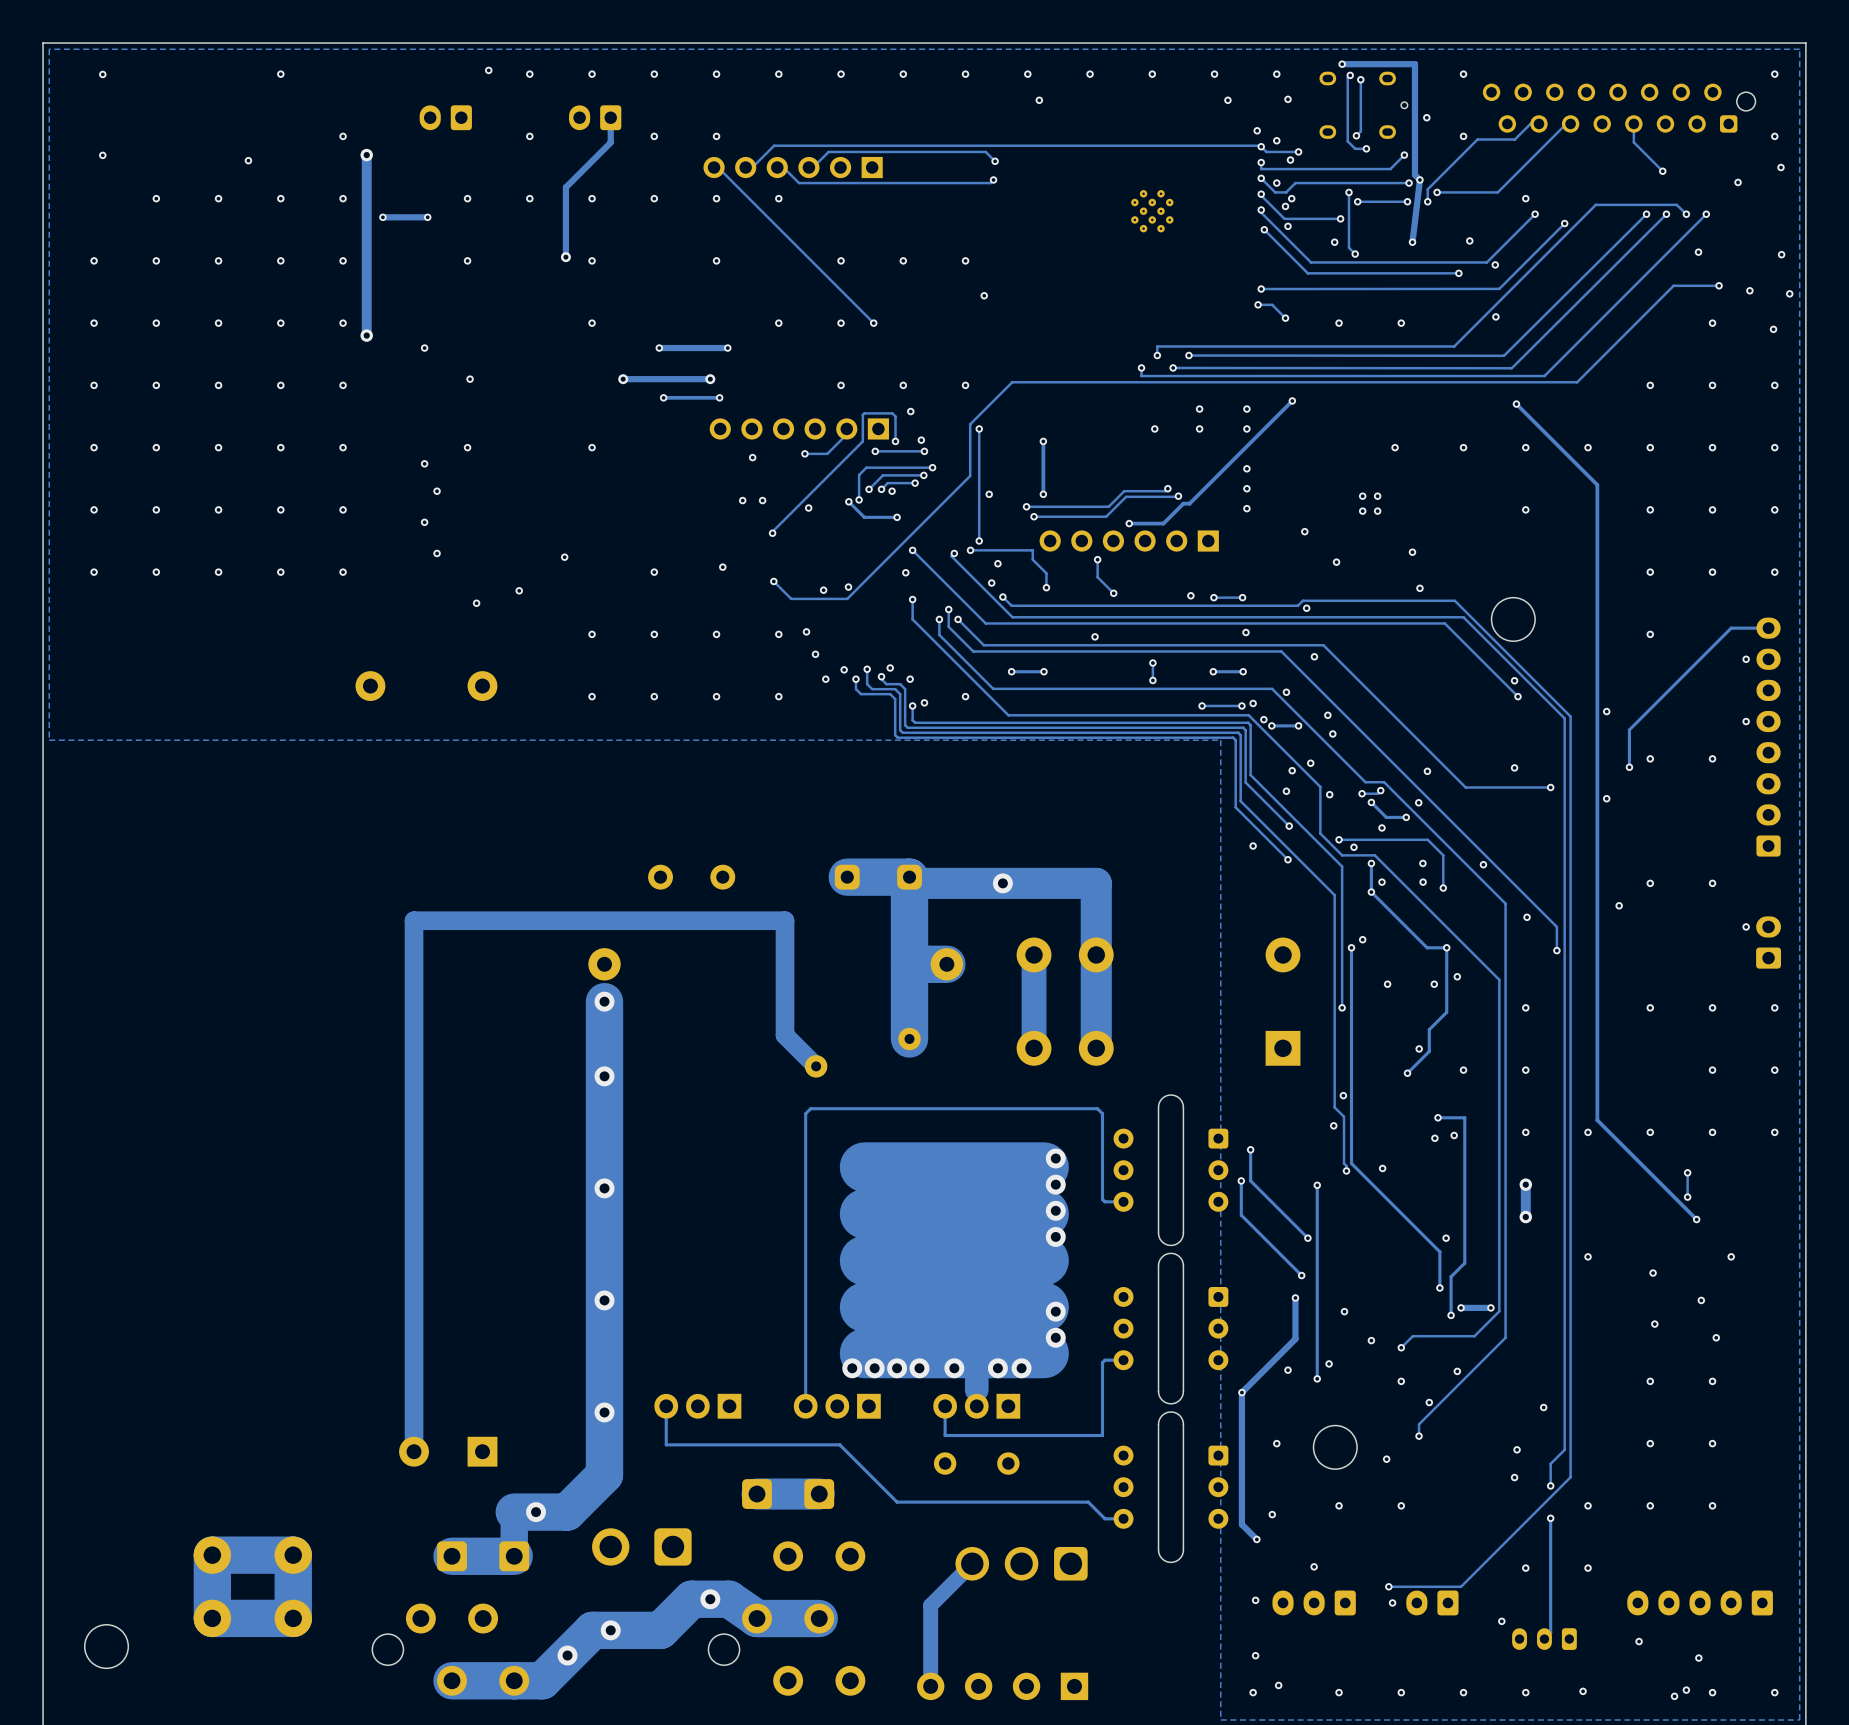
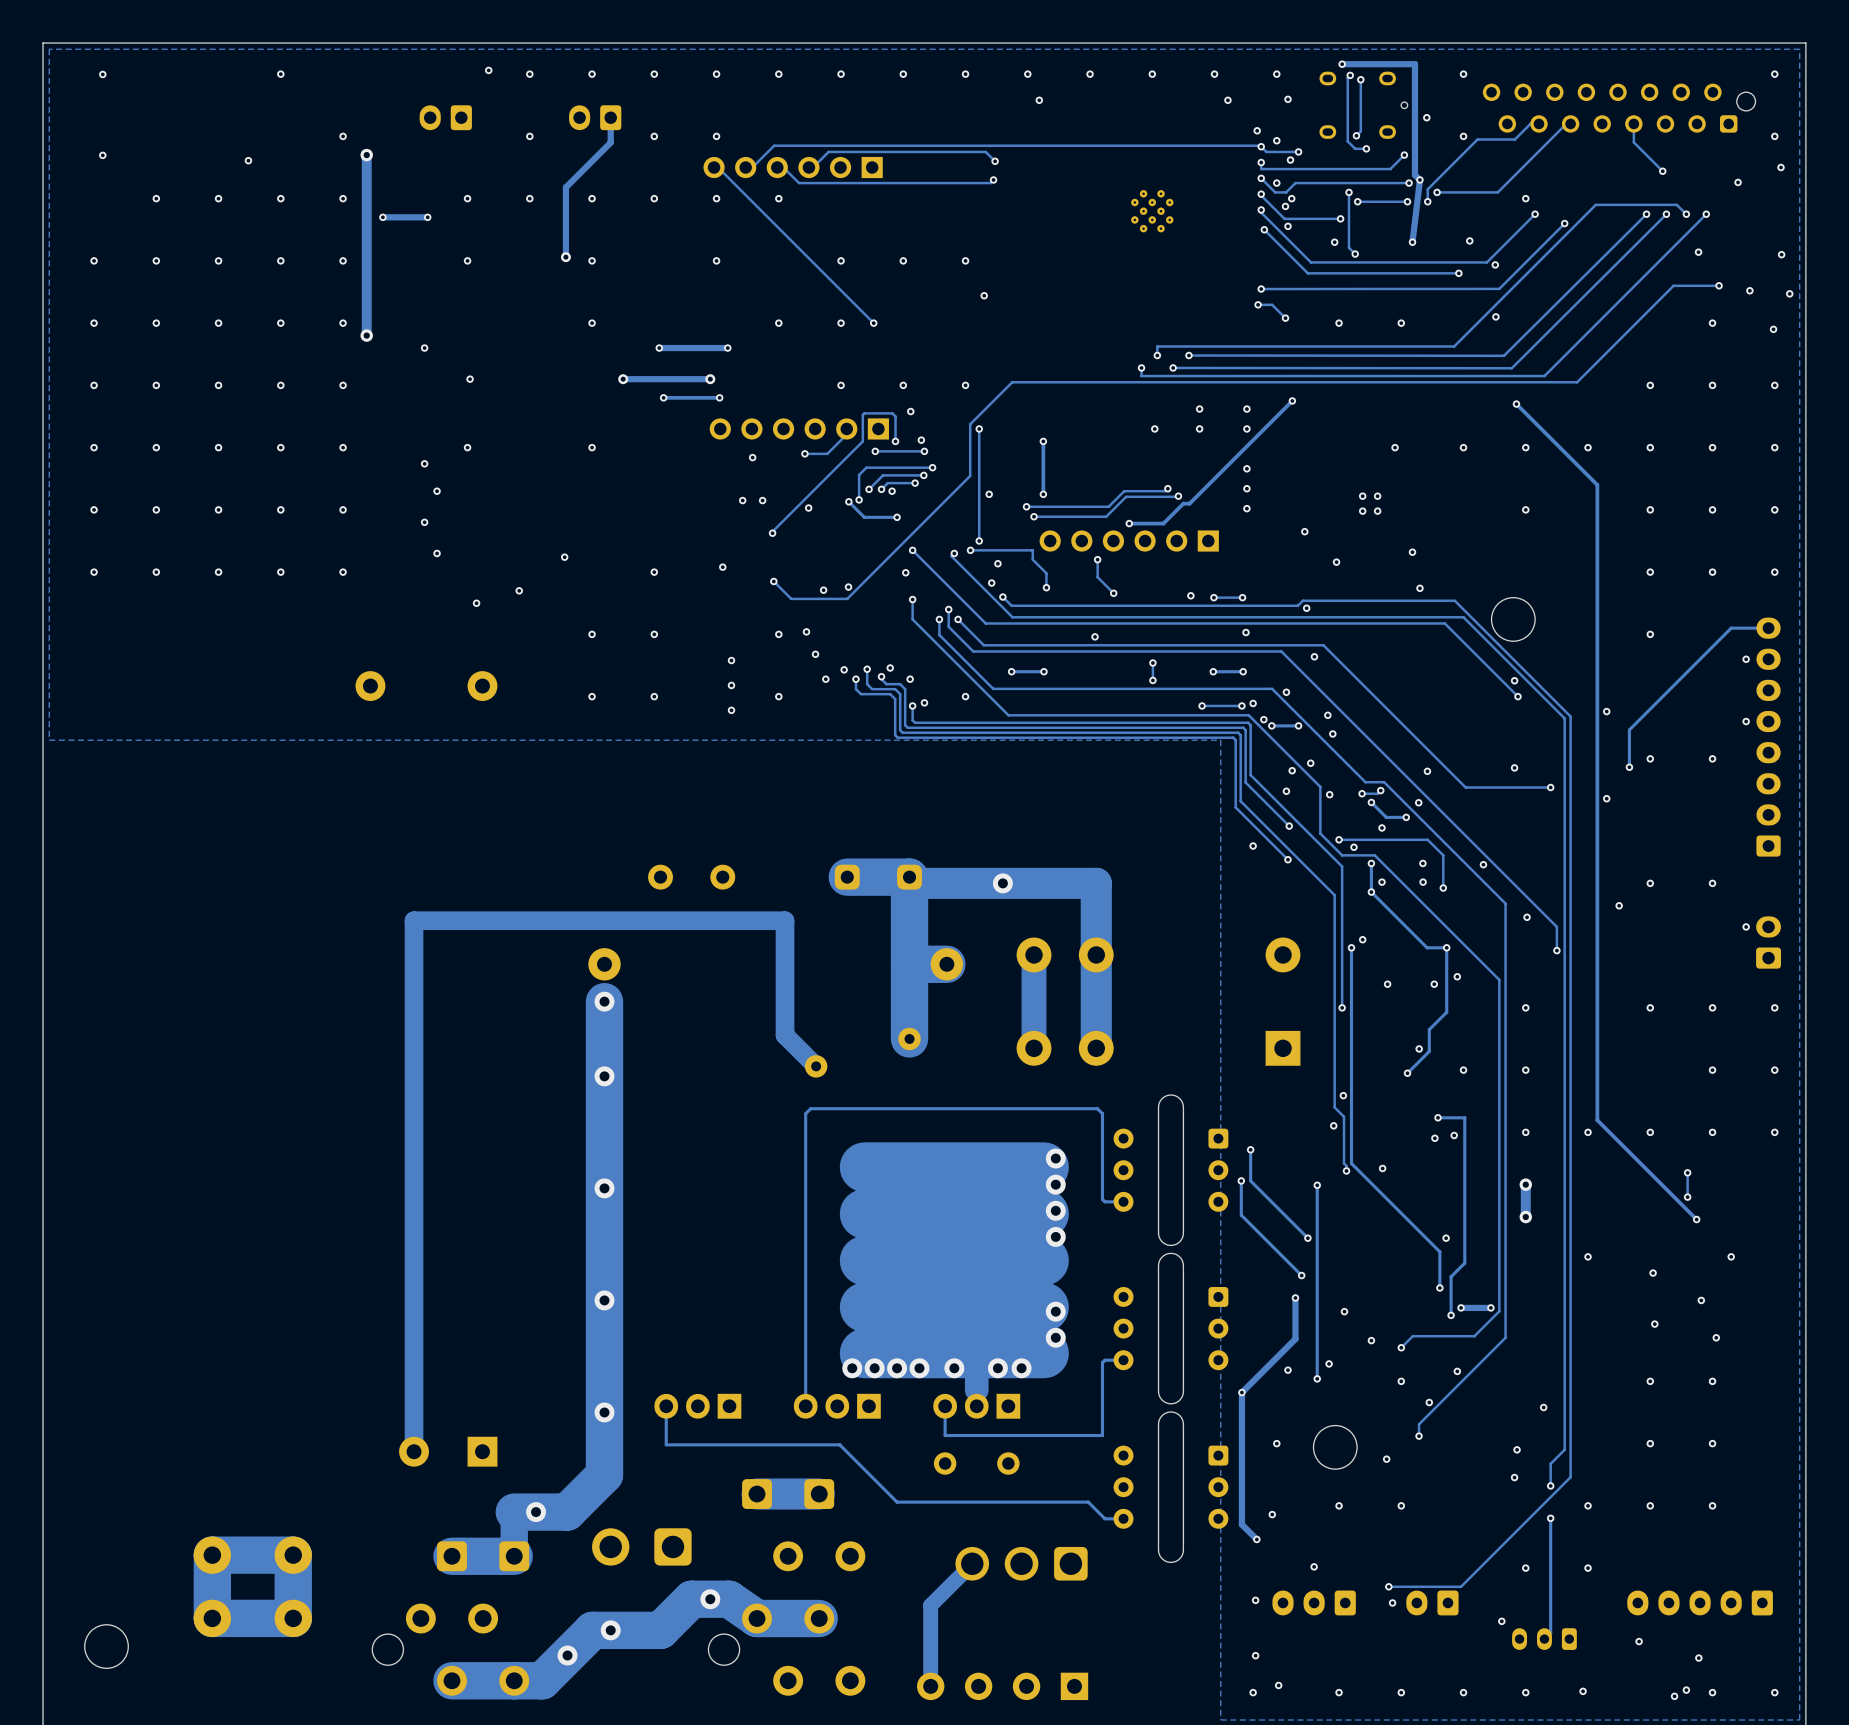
via: (716, 634) -> none
via: none -> (731, 660)
via: none -> (731, 685)
via: (716, 696) -> none
via: none -> (731, 710)

